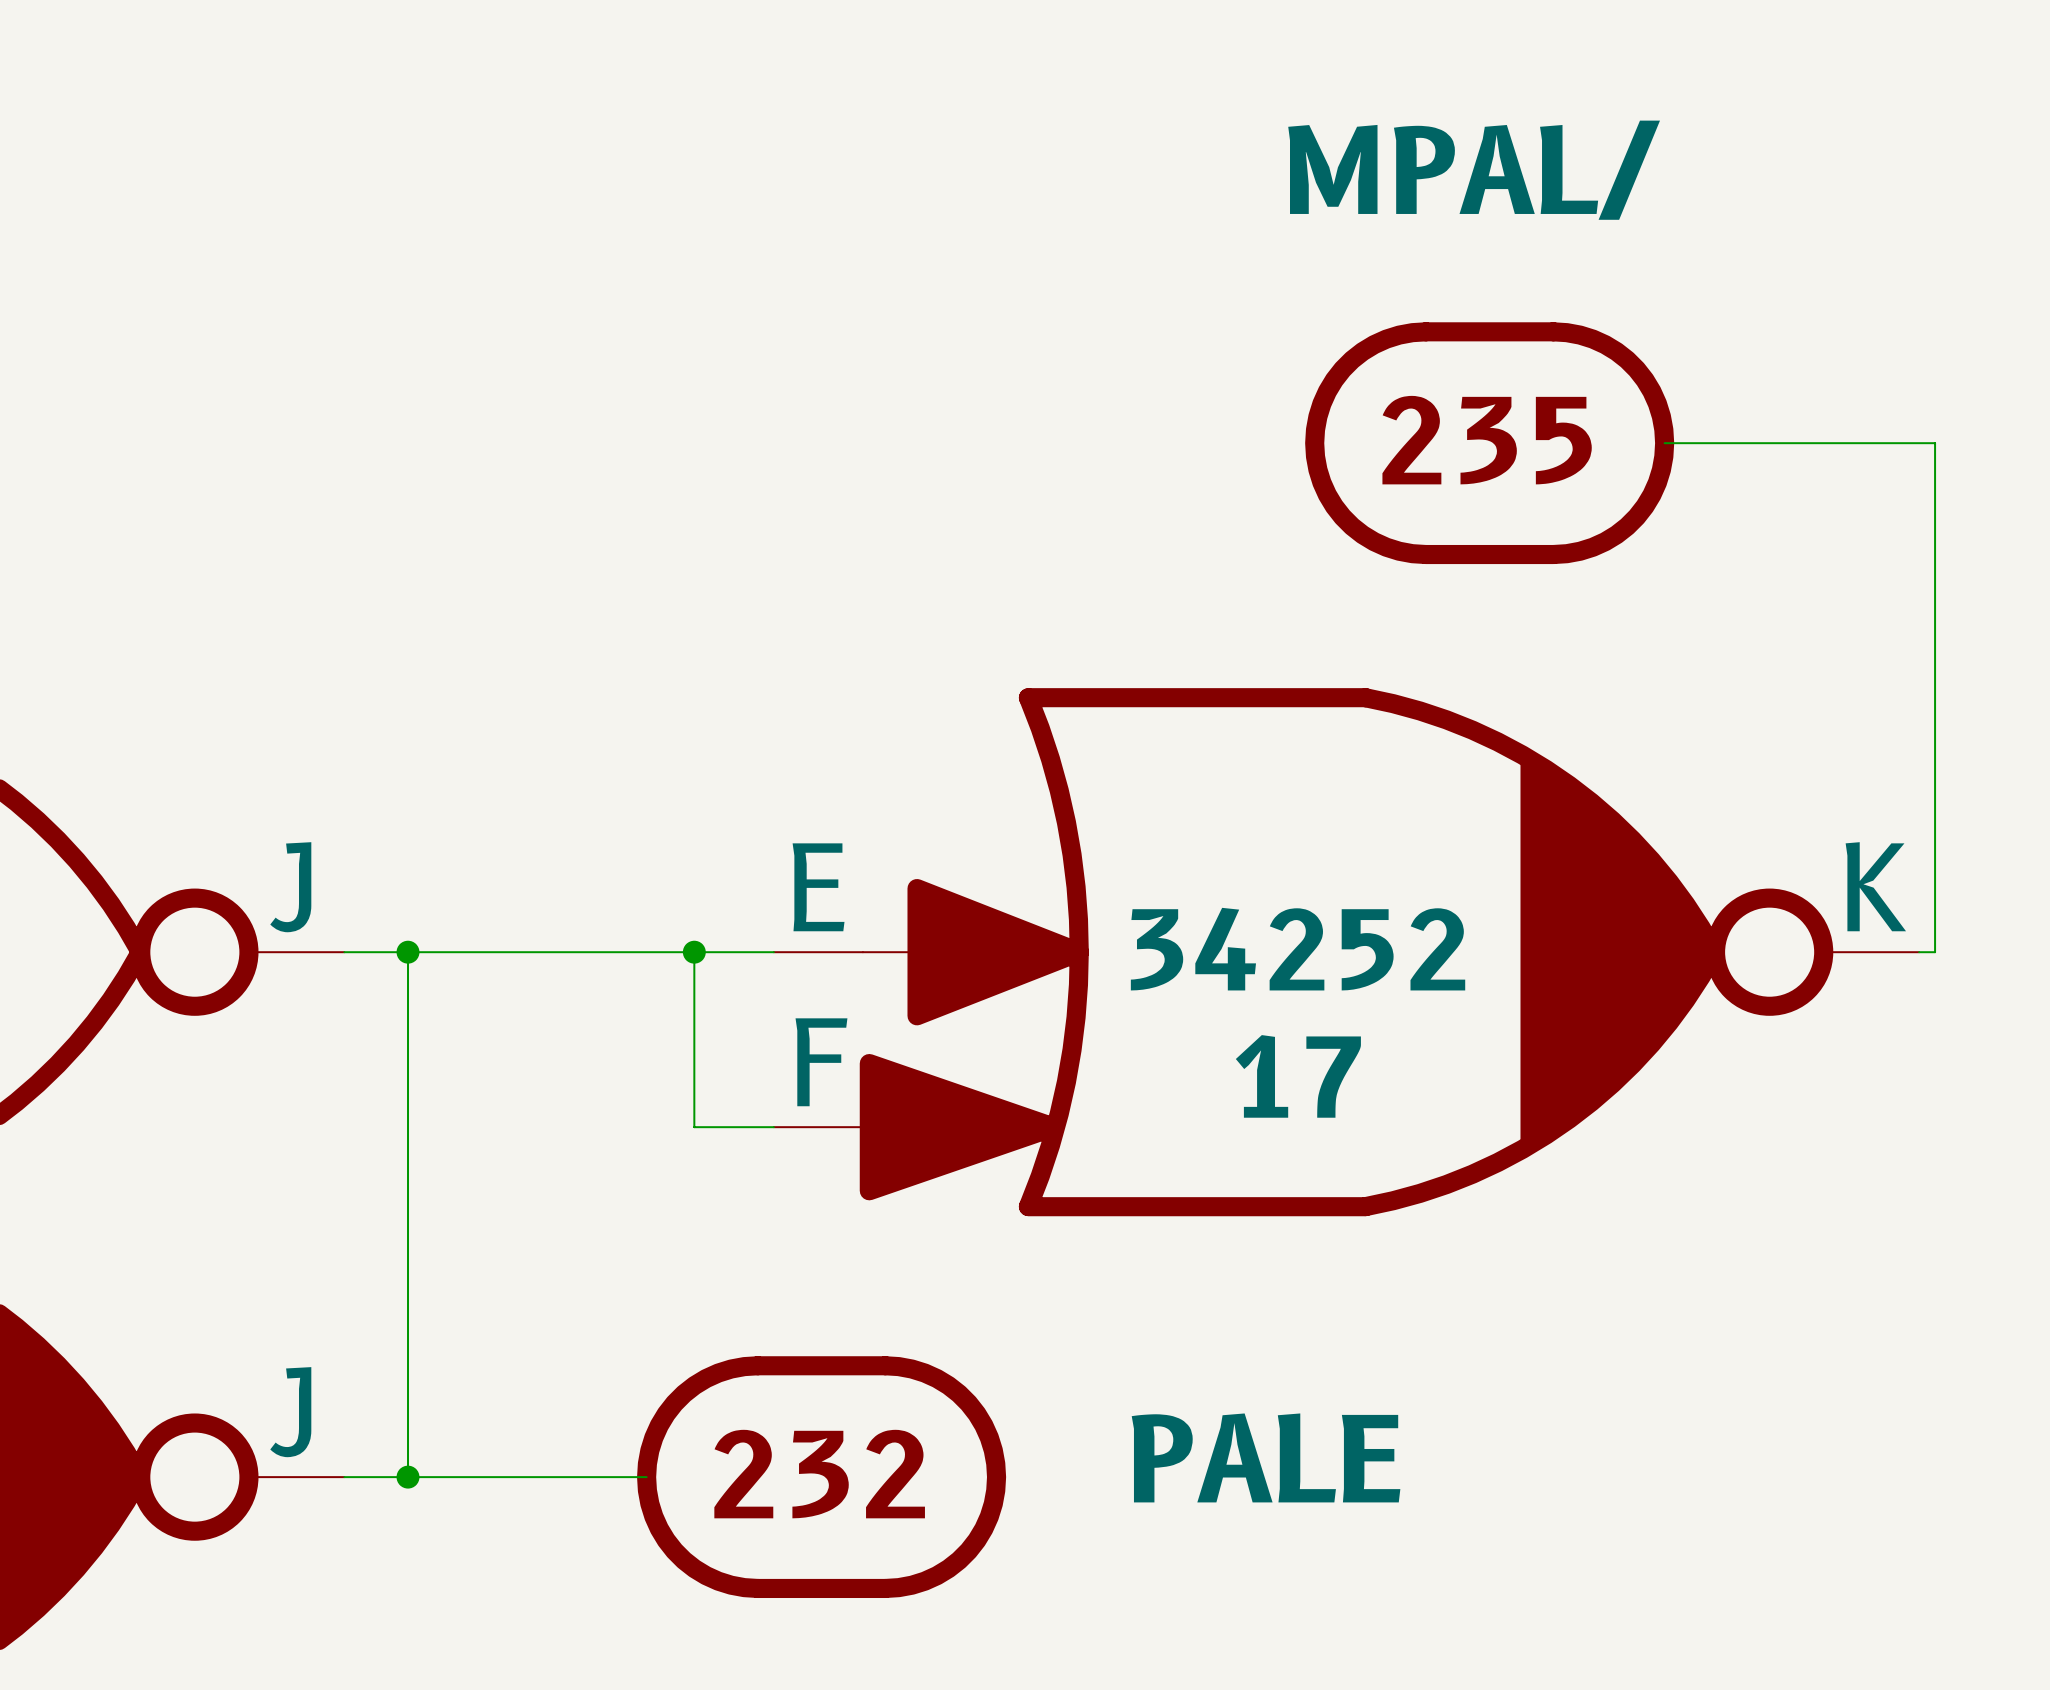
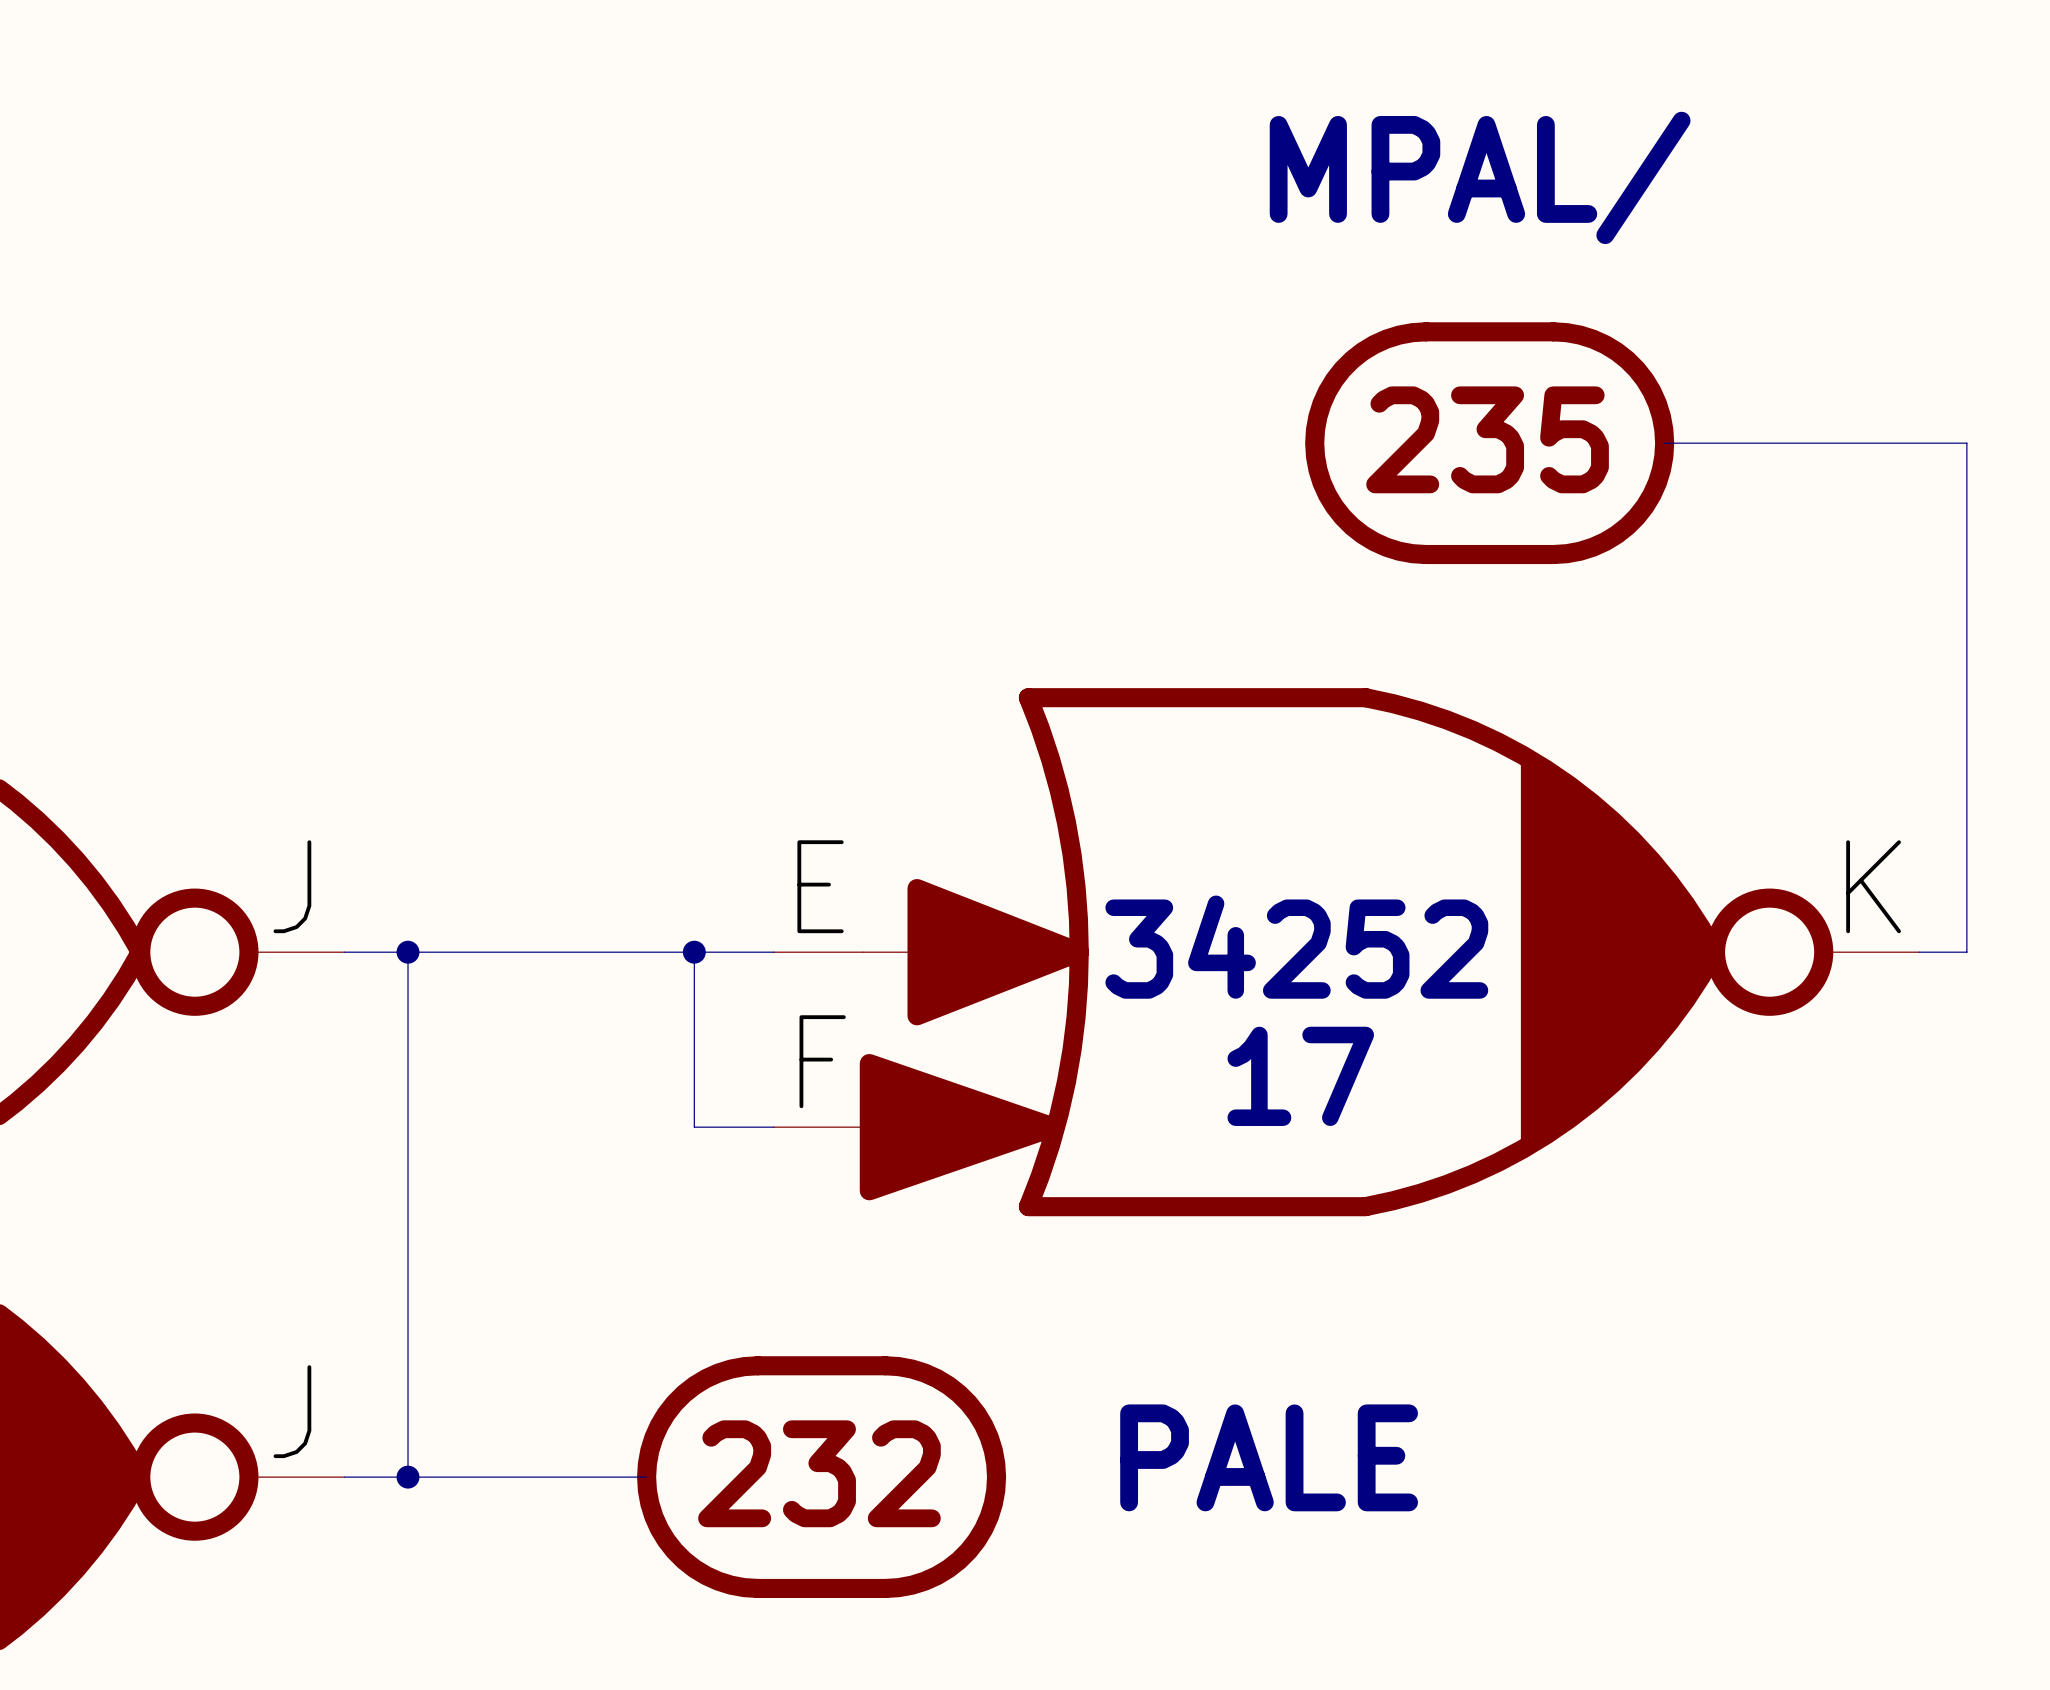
wire: (1935, 443) (1935, 952) -> (1935, 443) (1966, 443) (1966, 952) (1935, 952)

